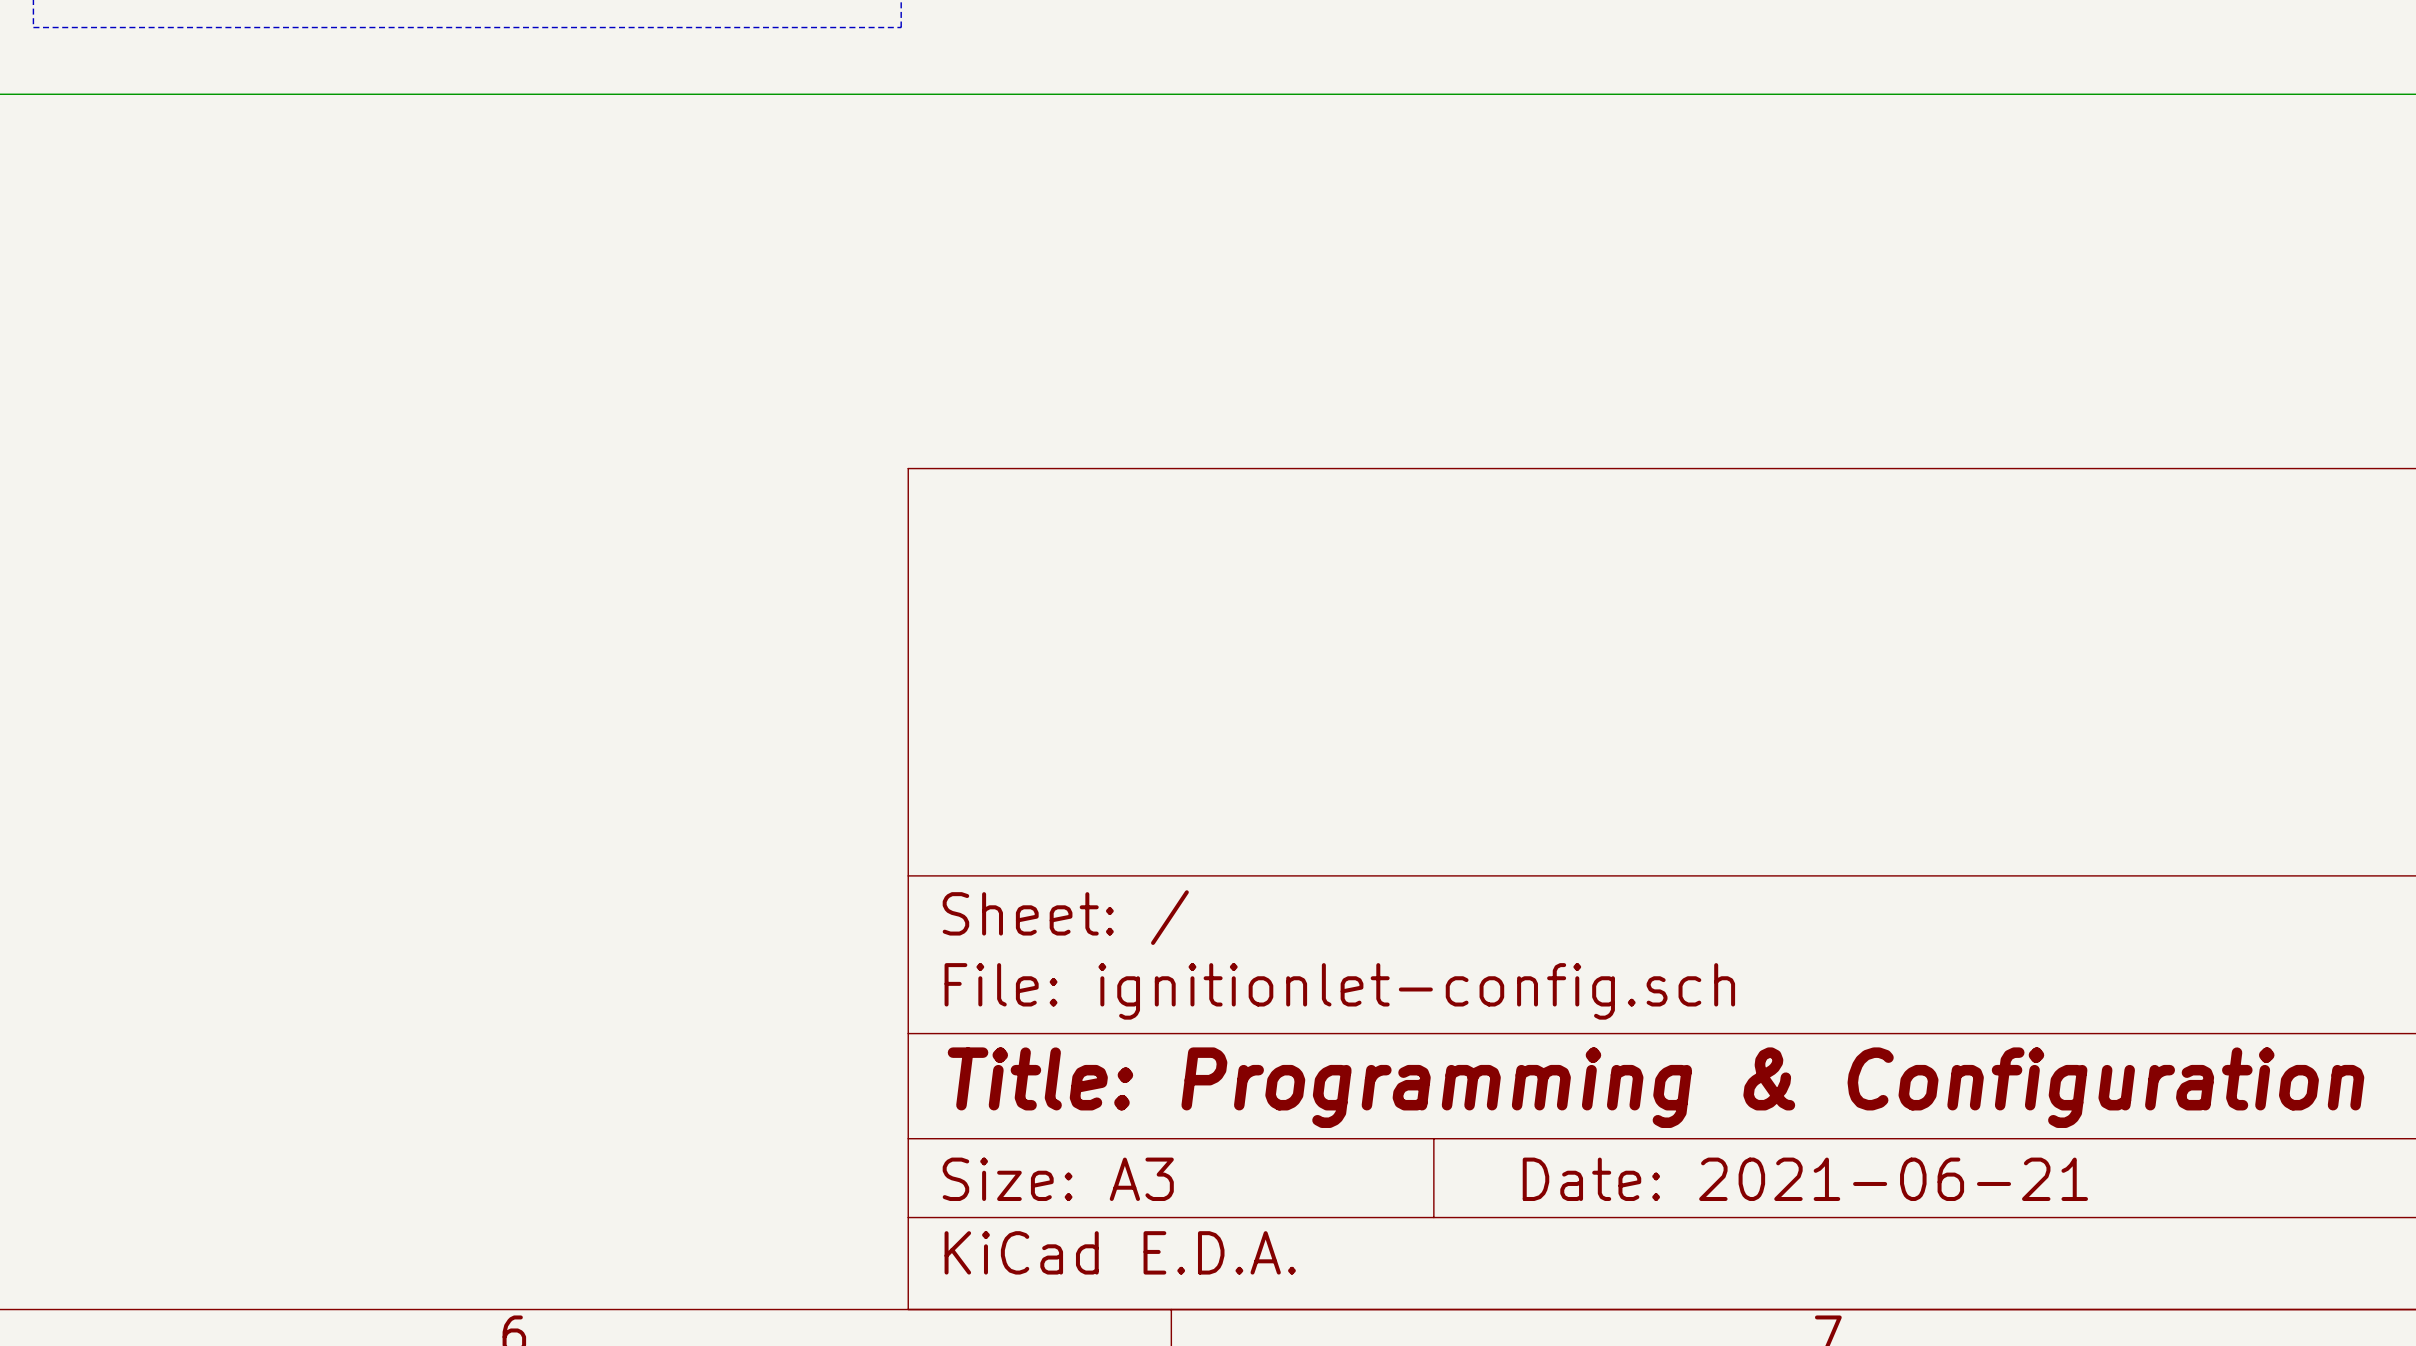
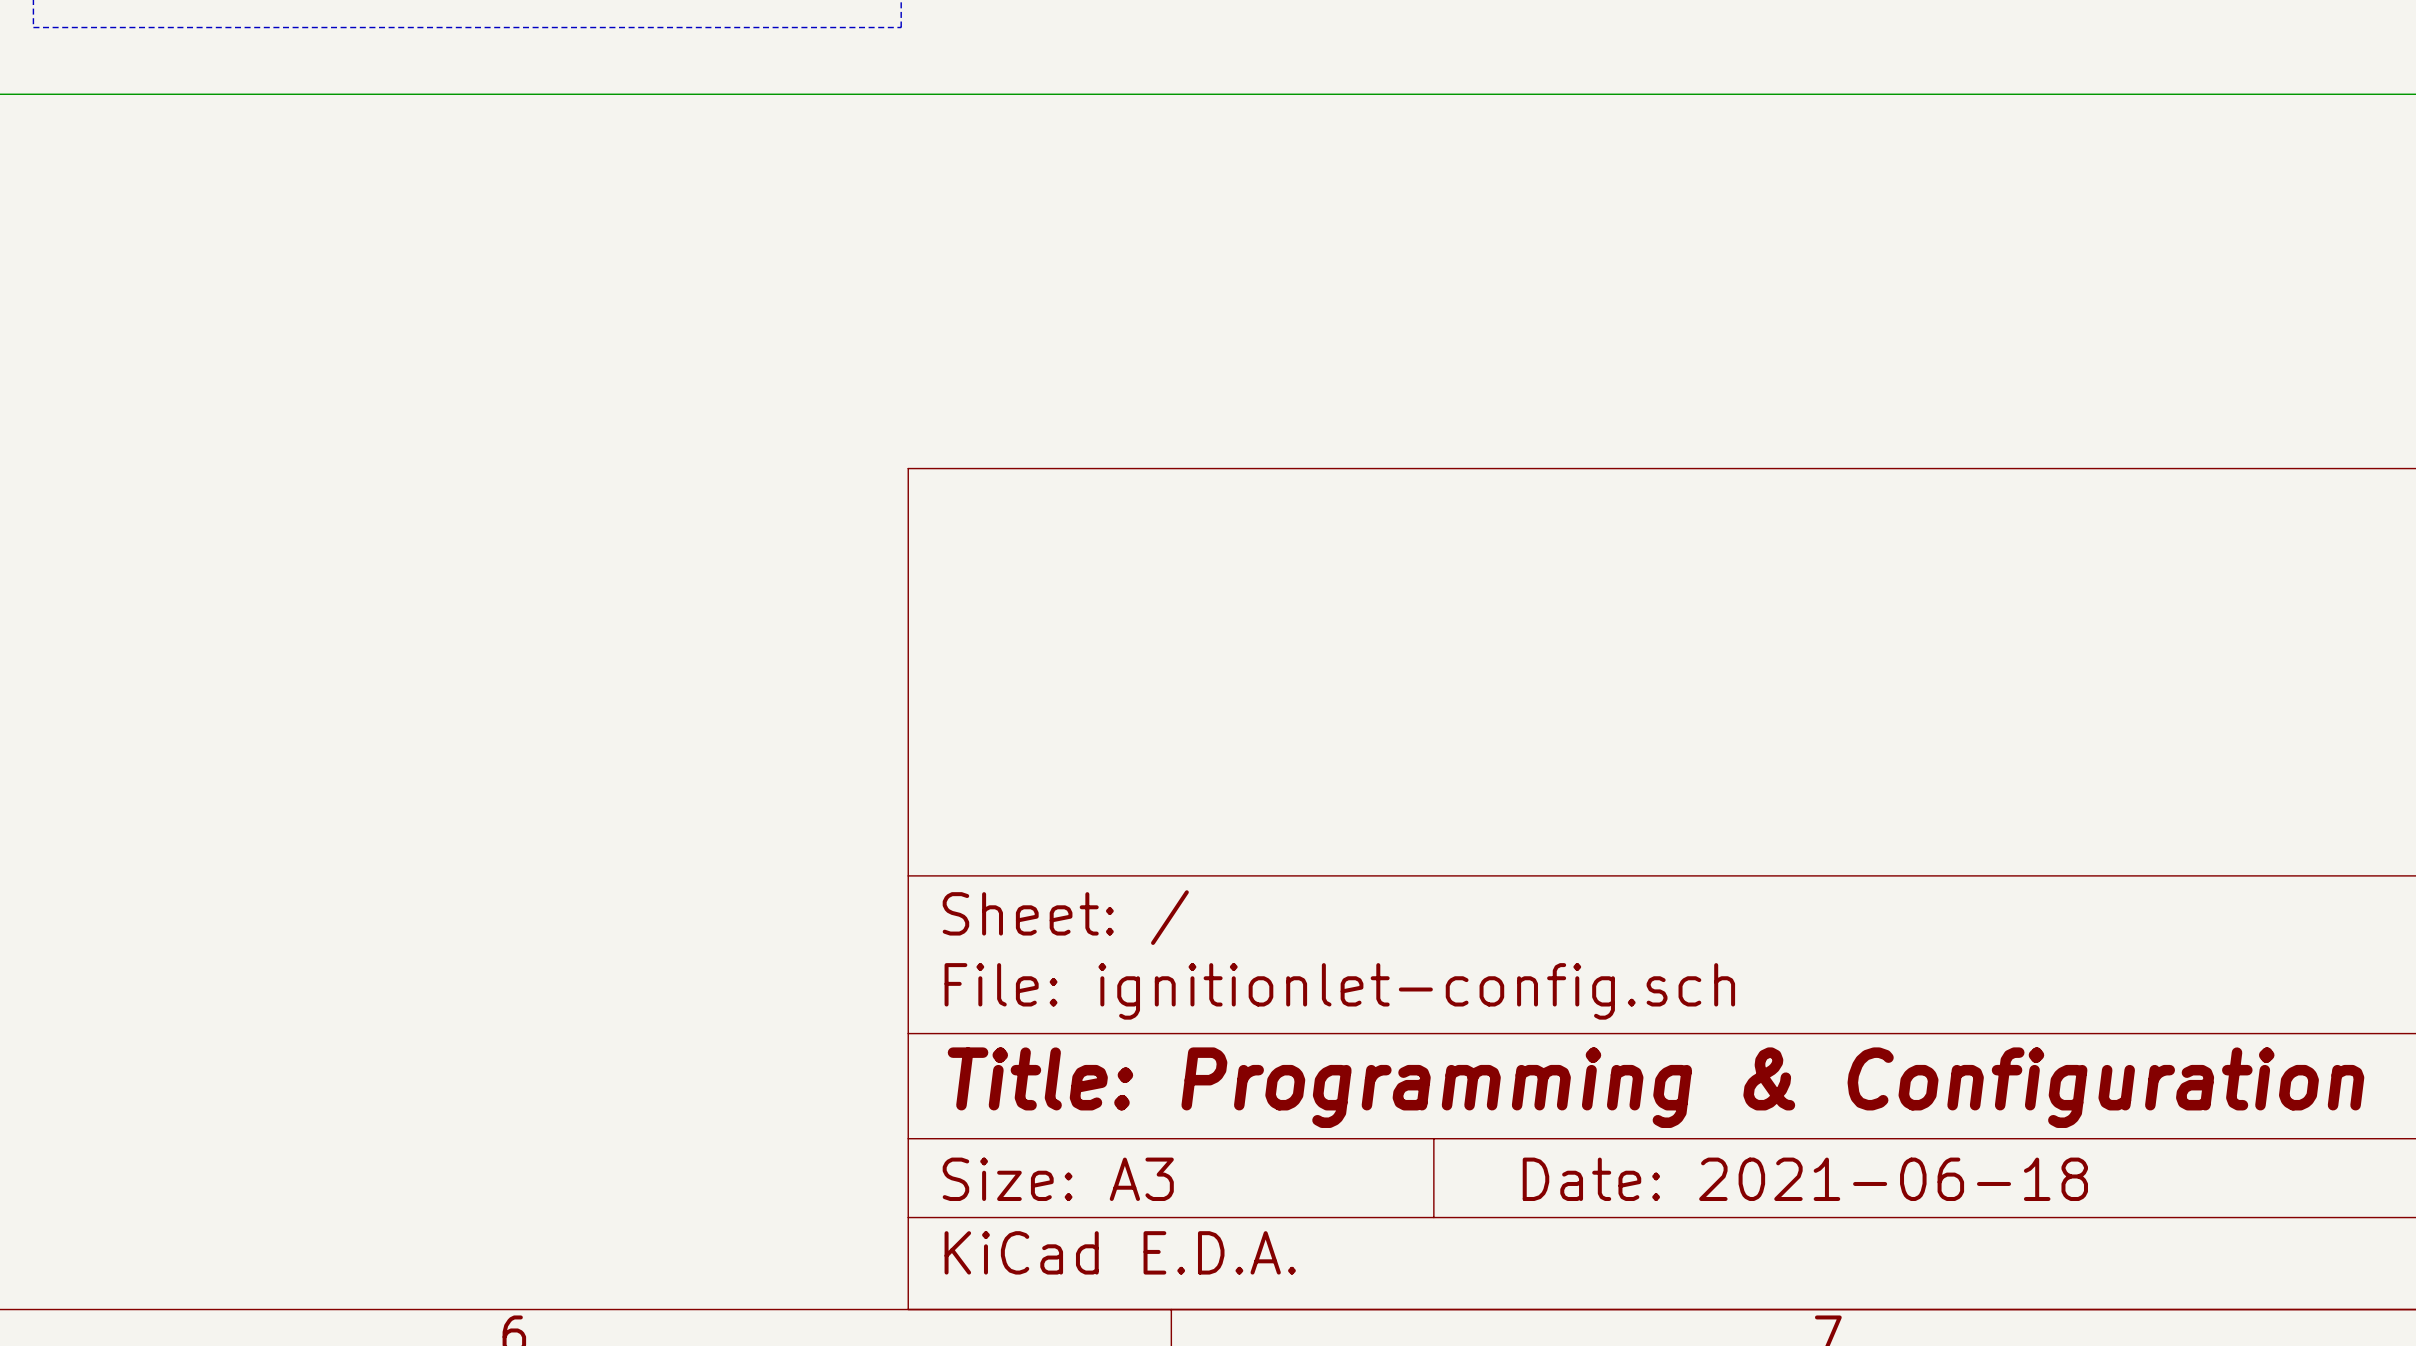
title block: Date: 2021-06-21 (1805, 1179) -> Date: 2021-06-18 (1805, 1179)

